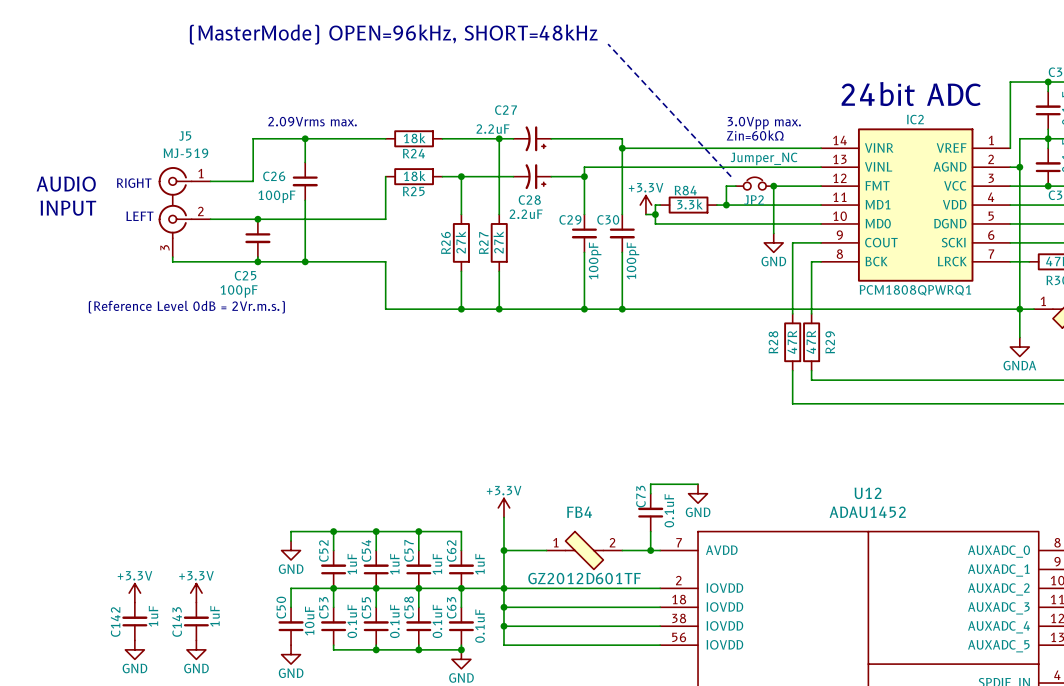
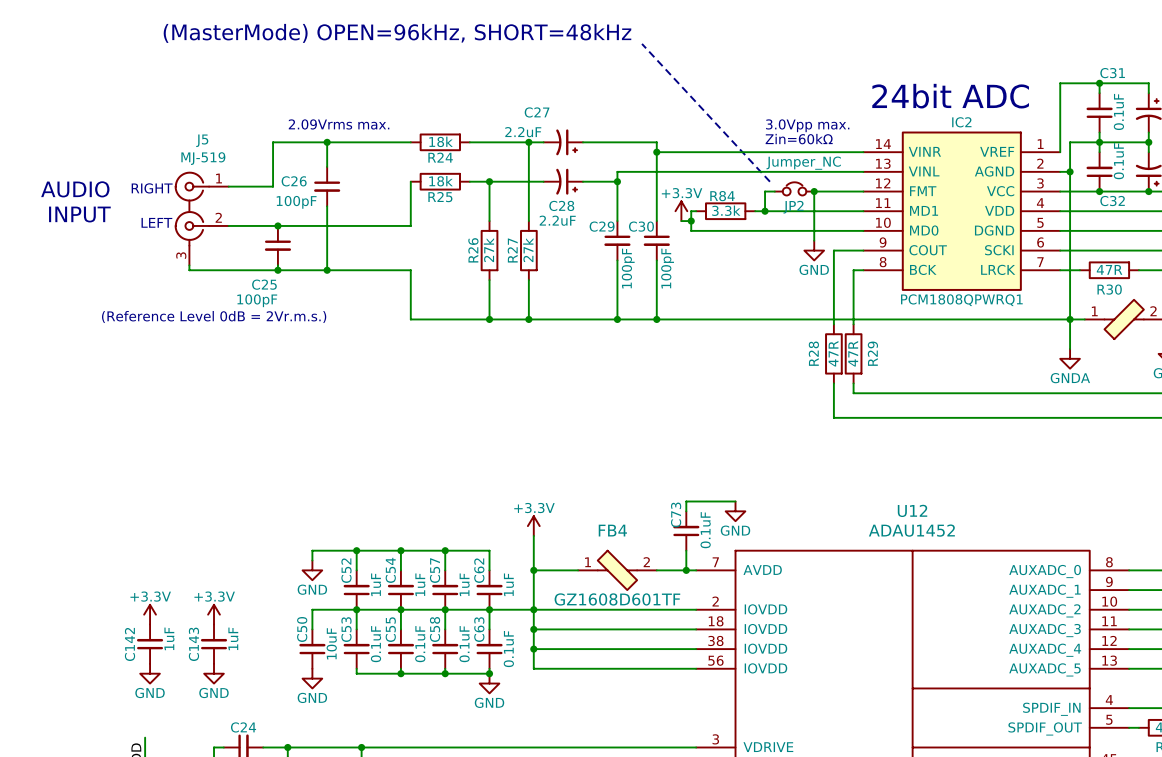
FB4 value: GZ2012D601TF (584, 578) -> GZ1608D601TF (617, 599)

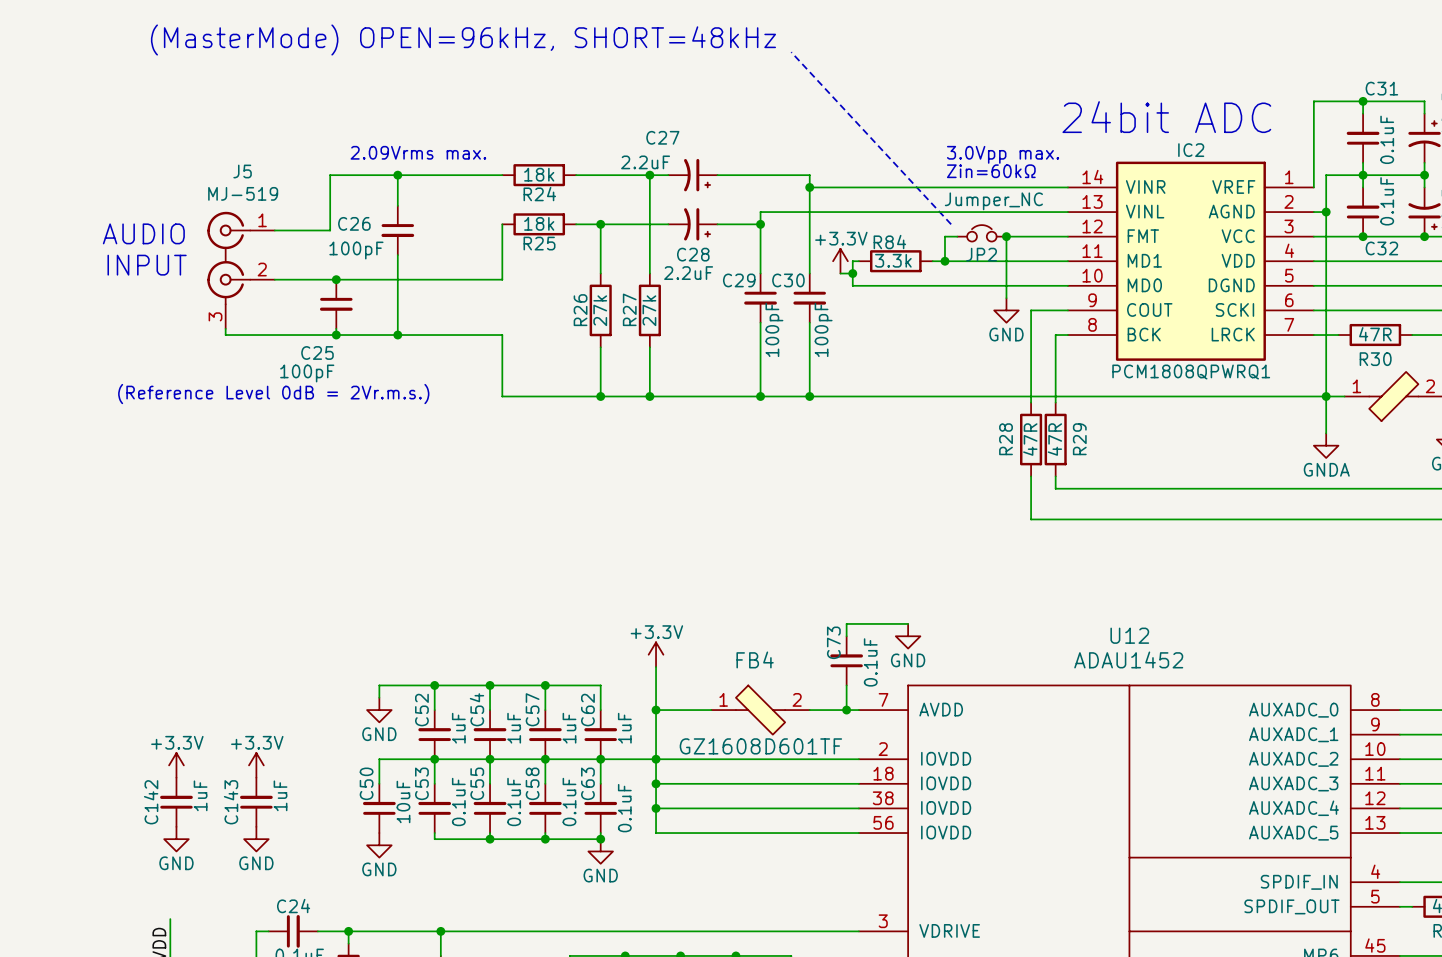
text: RIGHT (152, 188) -> none
text position: AUDIO (75, 189) -> AUDIO (143, 233)
text position: INPUT (79, 214) -> INPUT (147, 265)
text: LEFT (156, 222) -> none

